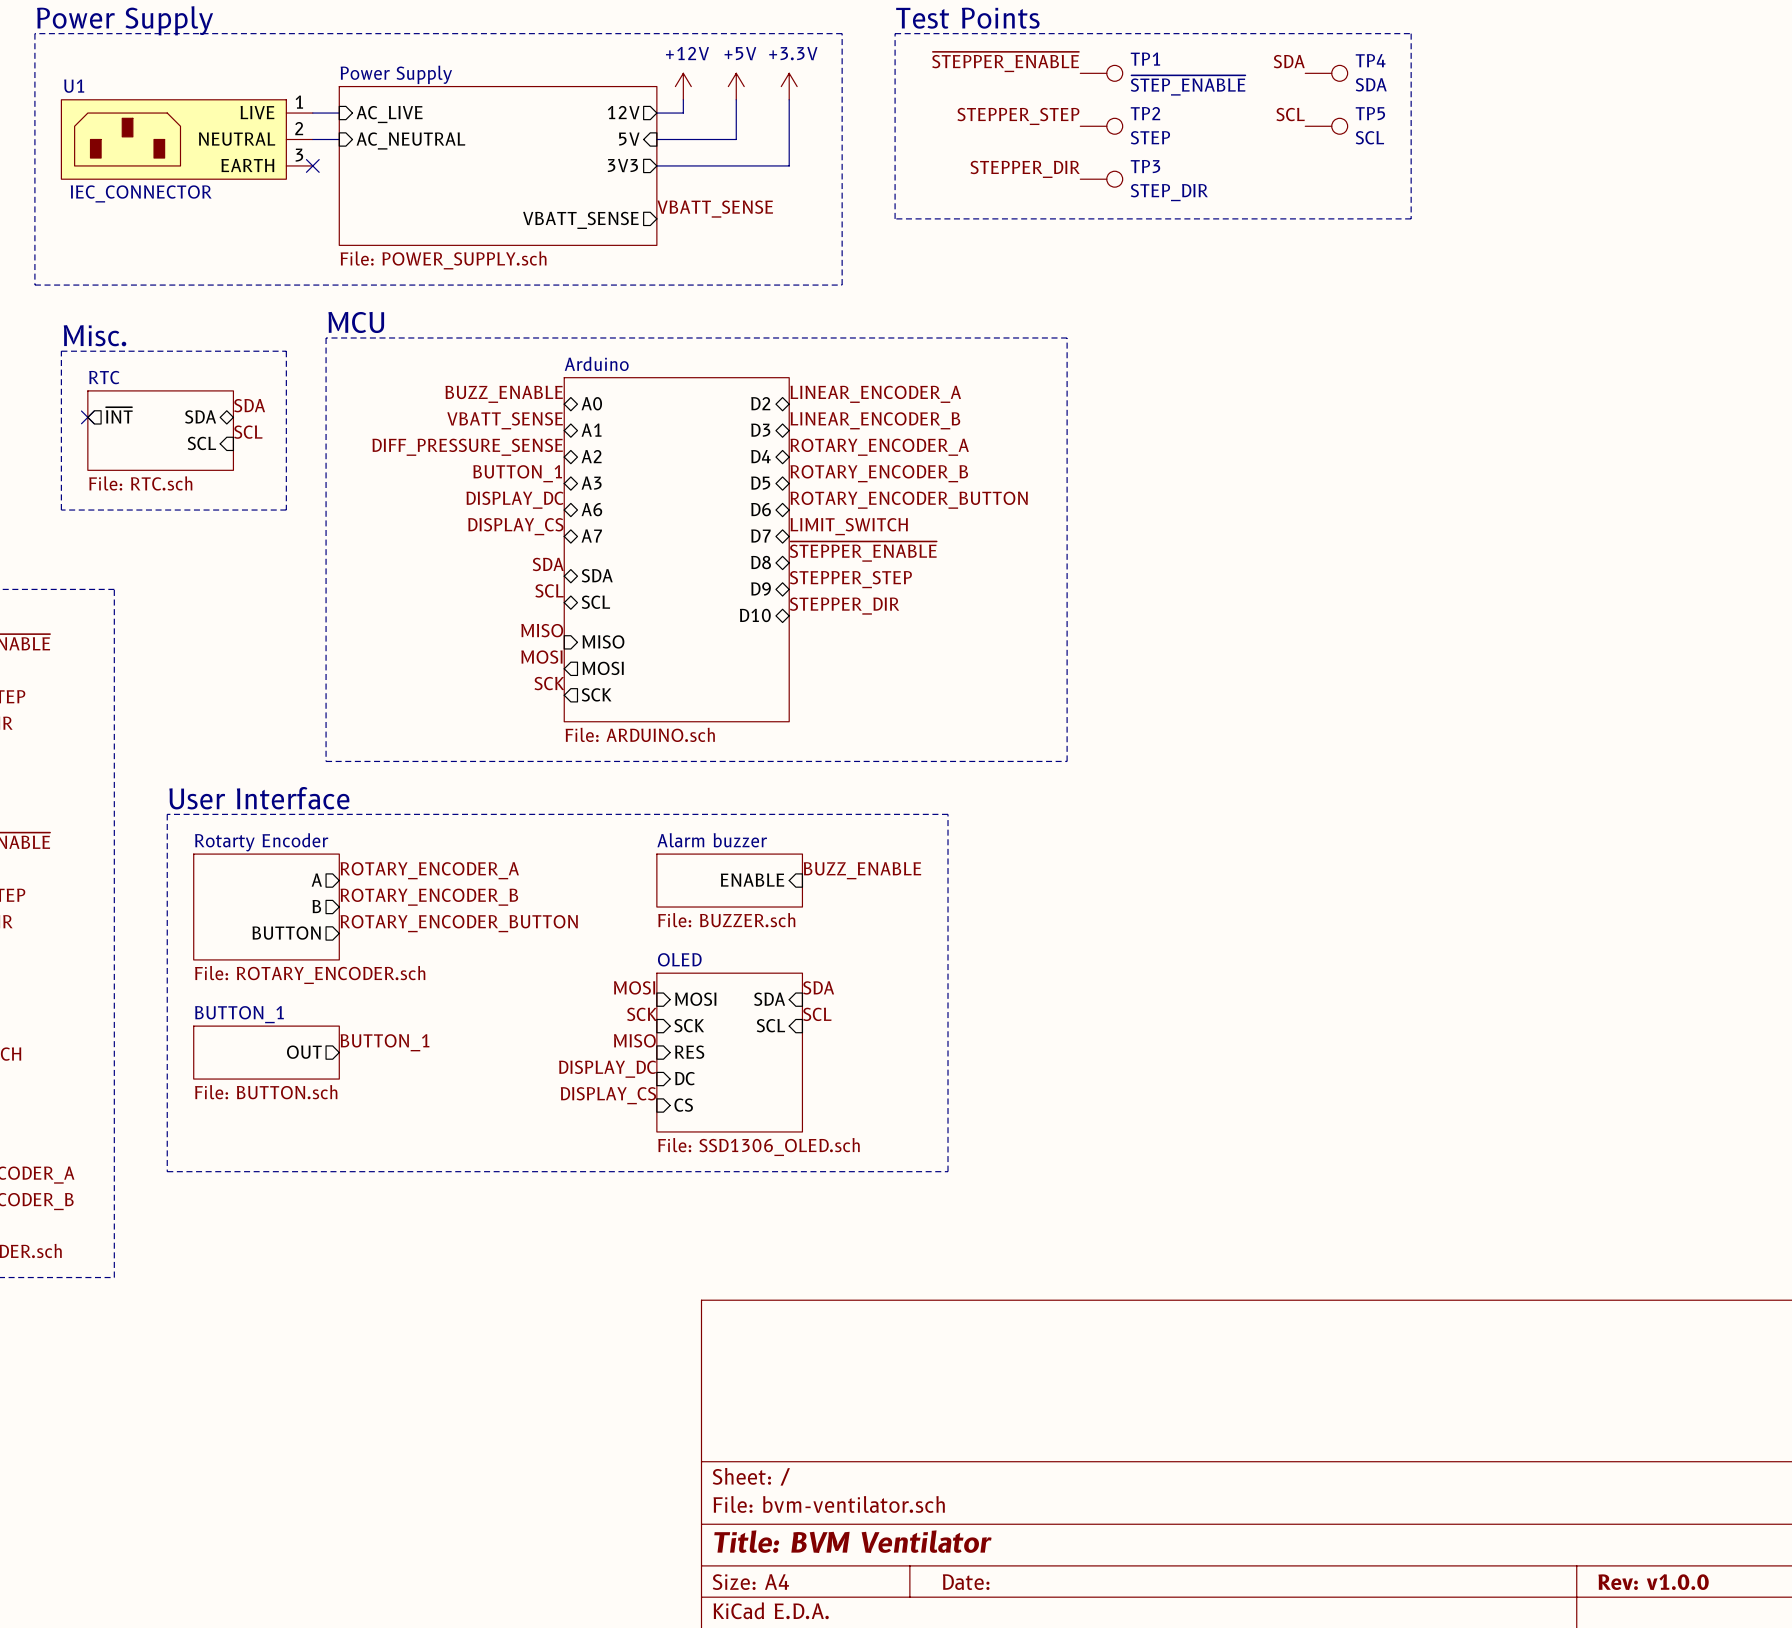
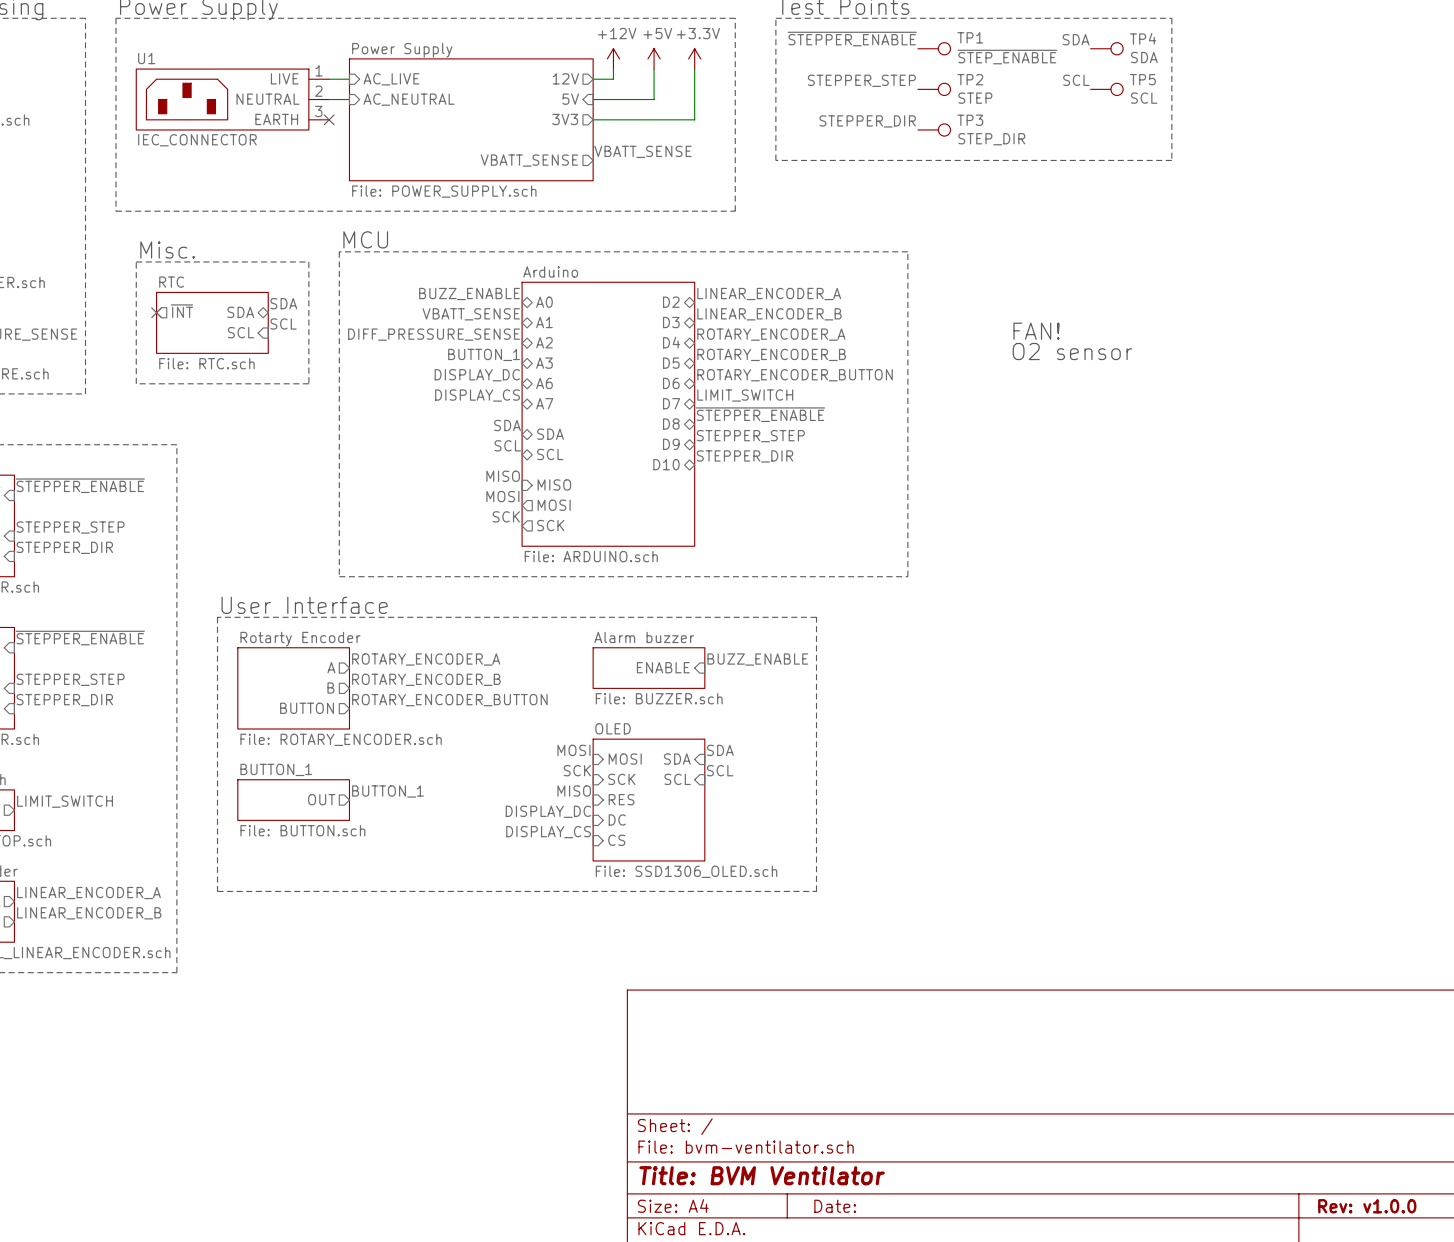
text: none -> FAN! (1036, 331)
text: none -> O2 sensor (1072, 351)

